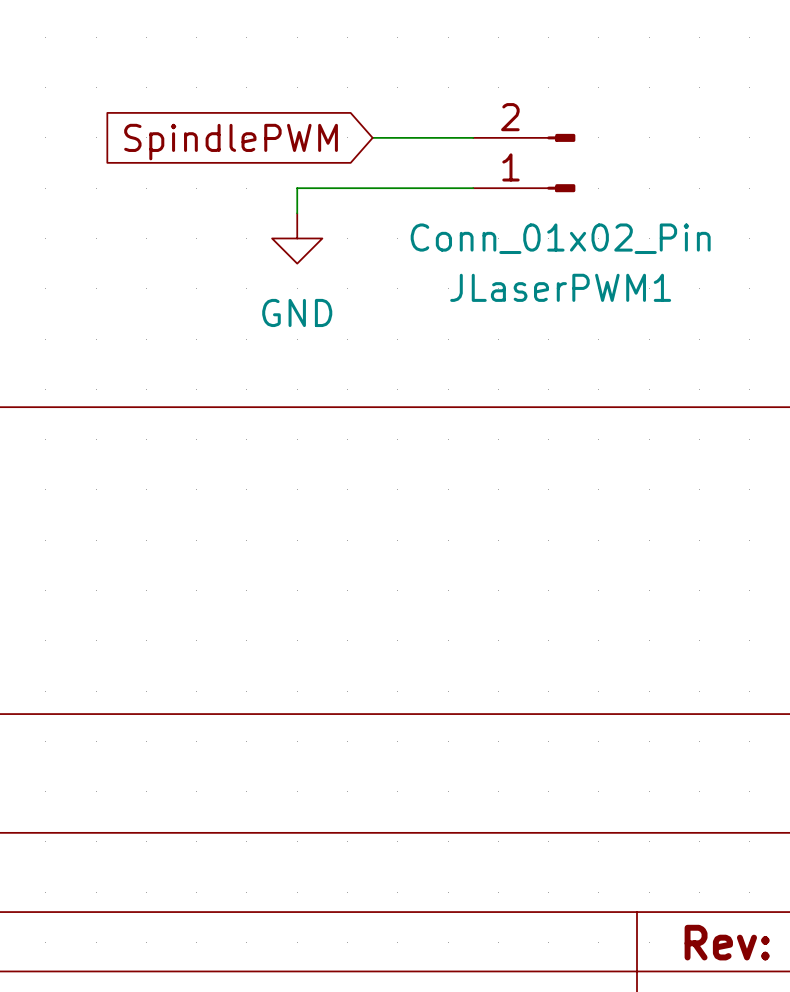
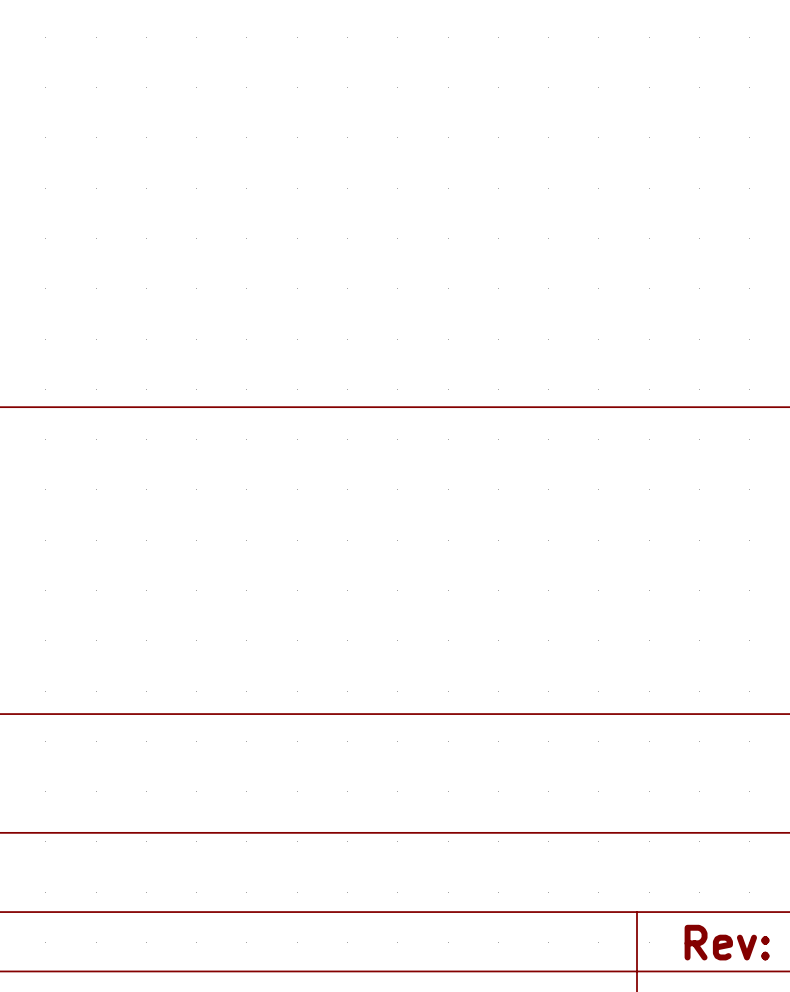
wire: (372, 137) (473, 137) -> none
global label: SpindlePWM (231, 142) -> none
JLaserPWM1: Conn_01x02_Pin (524, 163) -> none
wire: (473, 188) (297, 188) (297, 213) -> none
power symbol: GND (297, 238) -> none

